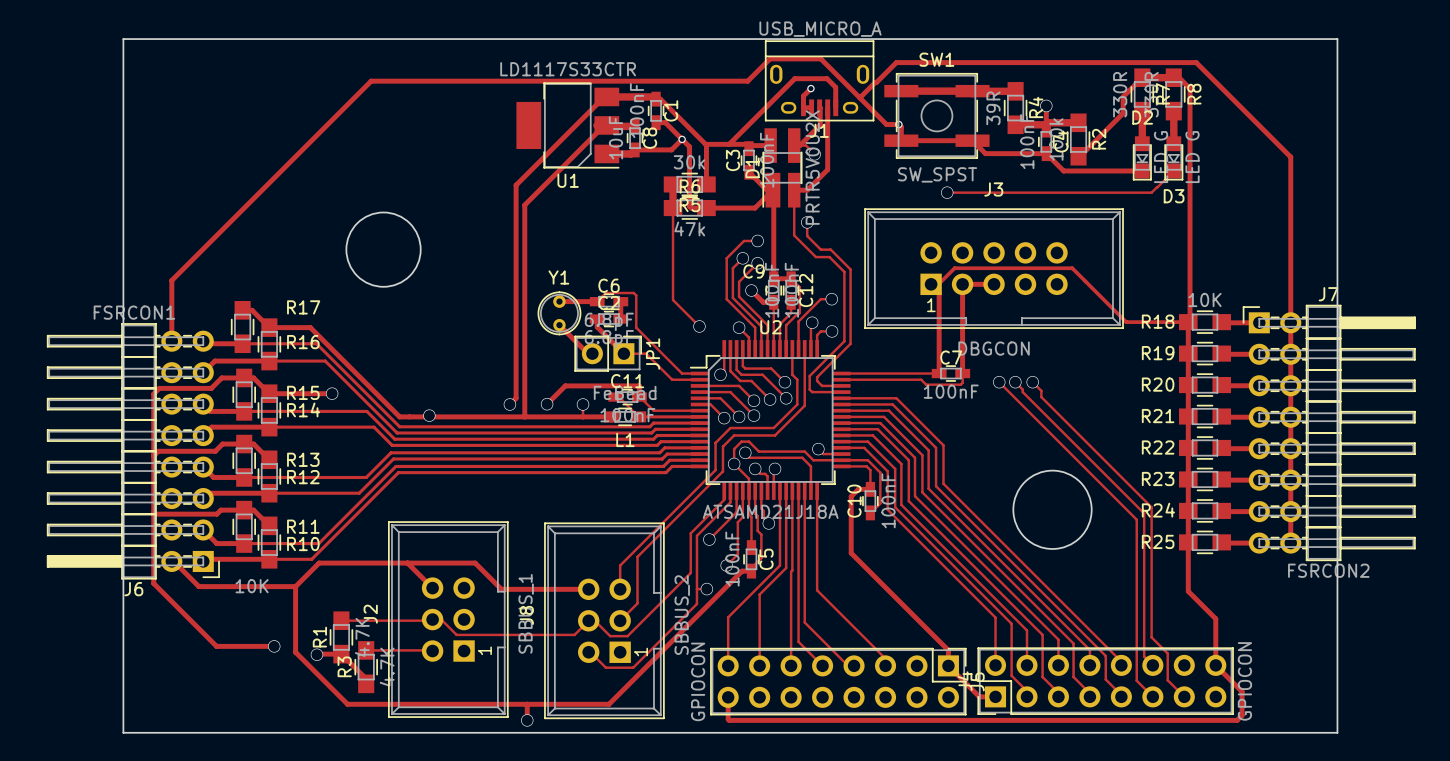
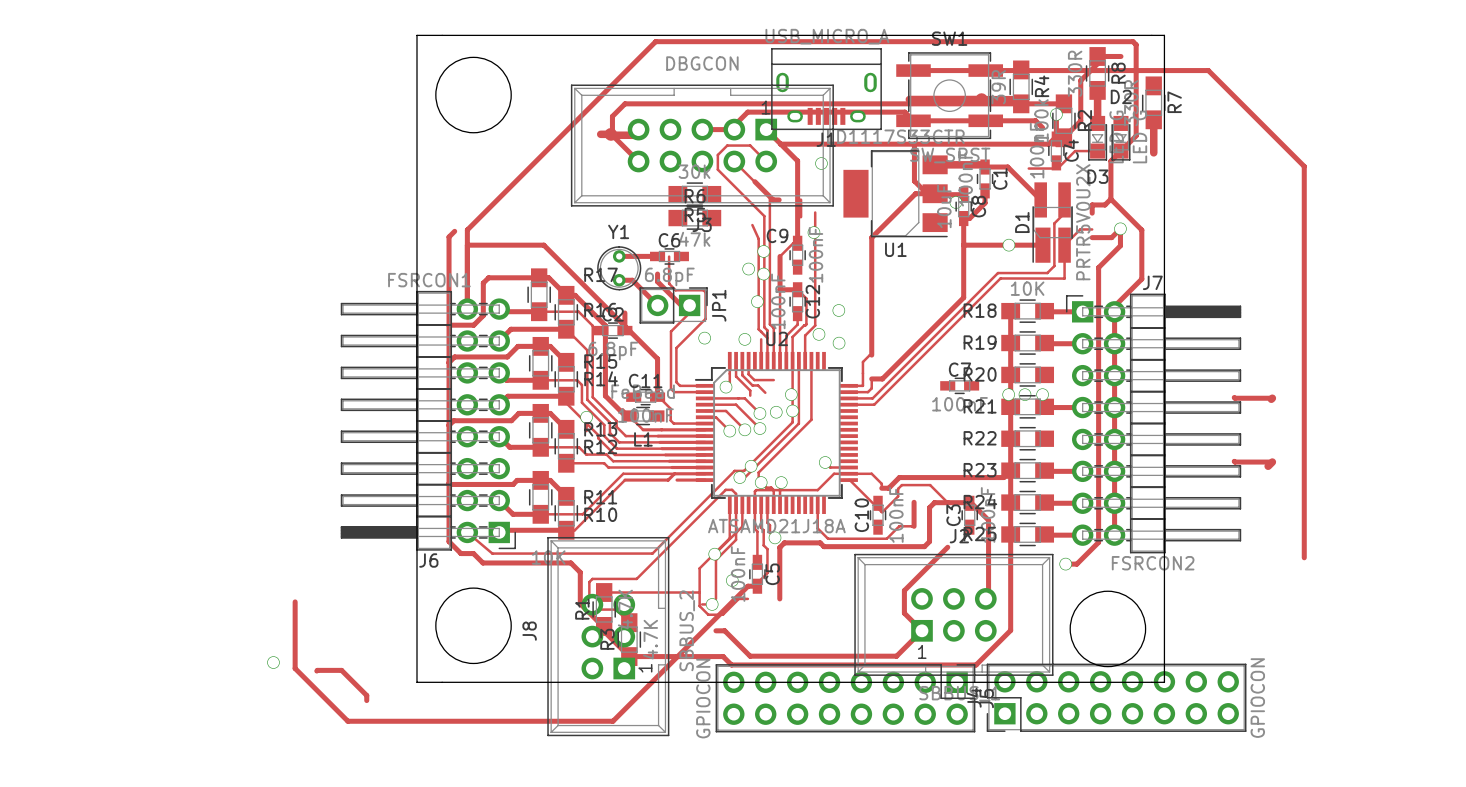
board edge: (123, 39) (1337, 39) (1337, 732) (123, 732) (123, 39) -> (417, 35) (417, 682) (1164, 682) (1164, 35) (417, 35)
track: none -> (1120, 56) (1097, 56) (1097, 63) (1080, 80) (1080, 120) (1063, 137) (1055, 137) (1048, 144) (780, 144)
track: (905, 62) (896, 62) (859, 97) -> none
track: (810, 88) (803, 96) (803, 107) (811, 107) -> none
via: (810, 88) -> none
R8 position: (1173, 94) -> (1097, 73)
track: none -> (1063, 103) (625, 103) (612, 116) (612, 135) (638, 161)
track: (653, 96) (604, 96) (516, 185) (516, 398) (509, 404) -> none
track: (656, 99) (660, 99) (706, 145) (706, 184) -> none
track: (819, 107) (820, 125) (799, 145) (794, 145) (805, 145) (814, 154) -> none
track: (827, 107) (827, 169) (807, 190) (794, 190) (794, 235) (815, 257) (829, 257) (844, 271) (844, 341) (809, 376) (809, 389) (812, 392) (841, 392) -> (1092, 229) (1080, 229) (1064, 245) (1064, 278) (1000, 278) (874, 404) (848, 404)
track: (835, 107) (835, 87) (827, 78) (794, 78) (729, 144) -> none
R4 position: (1015, 108) -> (1021, 86)
C1 position: (656, 110) -> (985, 178)
track: (1173, 111) (1173, 143) -> (1097, 90) (1097, 123)
SW1 position: (936, 115) -> (949, 95)
track: none -> (1042, 127) (1035, 120) (913, 120) (904, 112) (747, 112) (734, 125) (734, 129) (702, 129)
track: (656, 122) (665, 122) (689, 146) (689, 206) (691, 208) (755, 208) (772, 190) -> none
track: (1017, 122) (1015, 124) (1078, 122) (1076, 124) -> none
via: (898, 124) -> none
U1 position: (567, 125) -> (895, 193)
track: (606, 125) (604, 125) (524, 205) (524, 416) -> none
track: none -> (914, 144) (914, 181) (927, 193)
C8 position: (635, 138) -> (963, 206)
track: (682, 139) (671, 149) (635, 149) (631, 153) (606, 153) -> none
via: (682, 139) -> none
R2 position: (1078, 139) -> (1063, 120)
track: (705, 144) (770, 145) -> none
track: none -> (1097, 154) (1097, 151) (1075, 151) (1057, 168) (1028, 168)
track: none -> (766, 161) (750, 145) (727, 145) (717, 154) (717, 169) (764, 216) (764, 327) (767, 330) (767, 338)
track: none -> (932, 164) (982, 164)
track: (1078, 156) (1123, 113) (1123, 96) (1142, 77) (1179, 77) (1190, 88) (1190, 320) (1188, 322) -> none
track: none -> (985, 167) (1007, 167) (1040, 199) (1038, 199)
D2 position: (1142, 158) -> (1120, 138)
D3 position: (1173, 158) -> (1097, 138)
C3 position: (749, 160) -> (969, 515)
D1 position: (782, 167) -> (1052, 222)
track: (1142, 170) (1063, 170) (1046, 153) (985, 153) (972, 140) (901, 140) (901, 126) (898, 124) (886, 124) (820, 58) (770, 58) (747, 81) (371, 81) (171, 280) (171, 341) -> none
track: (1173, 174) (1173, 170) (1151, 192) (947, 192) -> none
track: (673, 184) (673, 300) (699, 326) -> none
track: none -> (1110, 199) (1141, 230) (1141, 279) (1114, 306) (1114, 535)
track: none -> (1110, 199) (1105, 204) (1092, 204) (1092, 213)
track: none -> (1110, 199) (1110, 161) (1136, 135) (1136, 44) (1133, 41) (655, 41) (467, 229) (467, 309)
track: (772, 190) (773, 245) -> (766, 129) (797, 161) (797, 243) (793, 243) (780, 256)
via: none -> (1120, 228)
track: none -> (454, 231) (449, 237) (449, 541) (460, 553) (473, 553) (482, 562) (570, 562) (580, 572) (580, 603) (602, 626)
track: (807, 222) (807, 236) (820, 249) (830, 249) (850, 269) (850, 343) (817, 377) (817, 380) (822, 385) (841, 385) -> (1064, 199) (1064, 213) (1054, 223) (1054, 266) (1047, 273) (997, 273) (872, 398) (848, 398)
track: none -> (1092, 237) (1111, 237) (1120, 228) (1120, 245) (1098, 267) (1098, 542) (1076, 564) (1065, 564)
track: none -> (963, 245) (1042, 245)
via: none -> (1008, 245)
track: (757, 240) (744, 240) (726, 258) (726, 299) (755, 327) -> none
round board edge position: (383, 249) -> (473, 95)
track: (742, 258) (732, 268) (732, 297) (752, 317) -> (752, 225) (758, 238) (758, 329)
track: (757, 263) (739, 281) (739, 296) (767, 325) -> (734, 161) (769, 197) (769, 324) (773, 328) (773, 336)
J3 rotation: 0° (994, 268) -> 180° (702, 145)
J3 position: (994, 268) -> (702, 145)
track: none -> (619, 280) (632, 280) (657, 305)
track: (994, 284) (962, 284) (962, 373) -> none
track: (751, 290) (763, 302) (773, 302) -> (780, 289) (780, 313)
C9 position: (773, 290) -> (797, 255)
track: (831, 299) (820, 299) (798, 321) (798, 323) -> (815, 212) (815, 325) (805, 335)
track: none -> (1010, 311) (1010, 630) (976, 664) (731, 664) (723, 656) (629, 656) (604, 631) (604, 625)
track: (559, 301) (597, 301) -> (619, 256) (657, 256)
track: (597, 301) (605, 293) (633, 293) (636, 295) (636, 327) (682, 373) -> (669, 256) (669, 283) (675, 290) (703, 290) (705, 292) (705, 318) (676, 348) (676, 382) (680, 385) (687, 385)
C6 position: (609, 301) -> (669, 256)
track: (242, 310) (252, 310) (269, 327) (310, 327) (399, 416) (611, 416) (611, 419) -> none
track: none -> (449, 325) (473, 325) (483, 315) (483, 283) (488, 277) (548, 277) (566, 295) (575, 295) (605, 325) (605, 395) (625, 416) (629, 416)
Y1 position: (559, 313) -> (619, 268)
track: none -> (566, 329) (511, 329) (499, 341)
track: (597, 319) (597, 327) (623, 353) (646, 353) (672, 379) -> (657, 274) (657, 281) (681, 305) (689, 305) (689, 313) (671, 331) (671, 388) (677, 392)
track: (812, 322) (810, 349) -> none
track: (1188, 322) (1126, 322) (1072, 268) (954, 268) (938, 284) (931, 284) (939, 292) (939, 373) (855, 373) -> (963, 194) (915, 193) (871, 237) (871, 355) (862, 361) (862, 385)
track: (1188, 322) (1188, 591) (1215, 618) (1215, 665) (1242, 691) (1242, 715) (1237, 720) (729, 720) (728, 697) -> none
R18 position: (1205, 322) -> (1027, 311)
track: (1221, 322) (1259, 322) -> (1044, 311) (1082, 311)
track: (559, 325) (588, 353) (592, 353) -> none
R17 position: (242, 327) -> (539, 294)
track: (739, 327) (749, 337) (749, 349) -> none
track: (832, 331) (820, 331) (817, 335) (817, 349) -> none
track: (203, 341) (205, 343) (316, 343) (399, 426) (649, 426) (653, 423) -> (499, 309) (501, 311) (578, 311) (592, 325) (592, 397) (616, 421) (616, 426) (625, 436) (658, 436)
R16 position: (269, 344) -> (566, 312)
track: none -> (792, 361) (792, 422) (744, 470) (734, 470) (652, 553) (492, 553) (467, 532) (469, 532)
track: none -> (566, 362) (550, 346) (518, 346) (507, 356) (454, 356) (449, 362)
JP1 position: (608, 353) -> (673, 305)
R19 position: (1205, 353) -> (1027, 343)
track: (1221, 353) (1259, 354) -> (1044, 343) (1082, 343)
track: (742, 362) (745, 368) (771, 368) (784, 382) -> (748, 374) (754, 380) (773, 380)
track: (736, 363) (736, 369) (741, 374) (762, 374) (786, 398) -> (742, 375) (752, 385) (758, 385) (765, 392)
track: (730, 364) (730, 371) (740, 380) (751, 380) (770, 399) -> (736, 376) (750, 390) (750, 395)
track: (203, 372) (214, 361) (325, 361) (397, 432) (651, 432) (655, 429) -> (566, 329) (587, 350) (587, 399) (609, 422) (609, 433) (619, 442) (660, 442)
track: (962, 373) (962, 382) (960, 384) (926, 384) (921, 379) (860, 379) -> (985, 190) (985, 203) (969, 218) (963, 218) (963, 297) (882, 378) (871, 378) (871, 388) (867, 392)
track: (792, 374) (797, 379) (797, 404) (773, 428) (730, 428) (715, 442) (715, 470) (620, 565) (620, 589) -> (798, 387) (798, 423) (741, 481)
track: (999, 382) (1136, 519) (1136, 680) (1152, 696) -> none
track: (1015, 382) (1022, 392) (1144, 513) (1144, 656) (1152, 665) -> none
track: (1032, 382) (1041, 390) (1041, 397) (1151, 507) (1151, 637) (1167, 653) (1167, 680) (1184, 696) -> none
R20 position: (1205, 385) -> (1027, 374)
track: none -> (566, 403) (566, 396) (507, 396) (499, 404)
track: (332, 393) (269, 393) (253, 377) (221, 377) (211, 388) (159, 388) (153, 393) (153, 583) (216, 646) (274, 646) -> none
via: (332, 393) -> none
R15 position: (244, 394) -> (540, 363)
C11 position: (627, 397) -> (645, 397)
track: (841, 398) (896, 398) (943, 445) (943, 483) (1121, 661) (1121, 665) -> none
track: (203, 404) (210, 411) (366, 411) (394, 439) (653, 439) (657, 435) -> (499, 372) (506, 380) (577, 380) (581, 384) (581, 402) (604, 425) (604, 436) (616, 448) (661, 448)
via: (509, 404) -> none
track: (547, 404) (565, 385) (639, 385) (639, 397) (653, 410) (668, 410) -> (467, 245) (543, 245) (657, 358) (657, 397) (670, 408) (670, 420) (673, 423)
via: (547, 404) -> none
track: (841, 404) (892, 404) (936, 447) (936, 486) (1105, 655) (1105, 679) (1121, 696) -> none
track: (804, 405) (775, 435) (734, 435) (722, 446) (722, 471) (637, 556) (637, 603) (620, 620) -> (811, 418) (758, 472) (758, 478)
R14 position: (269, 410) -> (566, 379)
track: (841, 410) (888, 410) (928, 450) (928, 488) (1089, 650) (1089, 665) -> none
via: (429, 415) -> none
L1 position: (625, 416) -> (643, 416)
track: (841, 416) (884, 416) (922, 455) (922, 492) (1073, 643) (1073, 677) (1089, 693) (1089, 696) -> none
R21 position: (1205, 416) -> (1027, 406)
track: (1221, 416) (1259, 417) -> (1044, 406) (1082, 407)
track: (841, 423) (880, 423) (915, 457) (915, 496) (1058, 639) (1058, 665) -> none
track: (841, 429) (877, 429) (908, 460) (908, 501) (1042, 634) (1042, 677) (1058, 692) (1058, 696) -> none
J7 position: (1329, 432) -> (1153, 423)
track: (203, 435) (211, 427) (373, 427) (392, 445) (657, 445) (661, 441) -> (566, 403) (614, 454) (665, 454)
track: (841, 435) (872, 435) (901, 463) (901, 504) (1026, 630) (1026, 665) -> none
track: (841, 441) (867, 441) (895, 468) (895, 507) (1011, 623) (1011, 675) (1026, 691) (1026, 696) -> none
track: (664, 447) (659, 452) (390, 452) (366, 477) (213, 477) (203, 467) -> (669, 461) (613, 461) (606, 454) (586, 454) (579, 447) (509, 447) (499, 436)
track: (841, 447) (864, 447) (887, 471) (887, 509) (995, 617) (995, 665) -> none
R22 position: (1205, 447) -> (1027, 438)
J6 position: (133, 451) -> (428, 420)
track: (745, 452) (749, 457) (802, 457) (810, 466) (810, 490) -> (914, 502) (914, 526) (899, 526) (886, 538) (828, 538) (817, 528) (817, 504)
track: (667, 454) (662, 459) (393, 459) (359, 493) (208, 493) (203, 498) -> (672, 467) (608, 467) (604, 463) (566, 463)
track: (153, 455) (158, 451) (215, 451) (222, 444) (253, 444) (269, 459) -> (449, 425) (453, 420) (511, 420) (518, 413) (550, 413) (566, 429)
R13 position: (244, 460) -> (540, 430)
track: none -> (674, 473) (623, 473) (582, 514) (513, 514) (499, 500)
track: (827, 460) (813, 460) (804, 451) (758, 451) (749, 441) (741, 441) (734, 449) (734, 463) (749, 478) -> (834, 473) (817, 490) (756, 490) (754, 492)
track: (864, 460) (867, 460) (880, 472) (880, 503) (870, 512) -> (871, 473) (881, 483) (881, 488) (888, 488) (899, 477) (1003, 477) (1010, 470)
track: (620, 466) (395, 466) (318, 543) (216, 543) (203, 529) -> (625, 480) (574, 530) (501, 530) (499, 532)
track: (672, 466) (666, 472) (398, 472) (311, 559) (205, 559) (203, 561) -> none
track: (842, 466) (866, 466) (870, 470) (870, 489) (858, 489) (851, 496) (851, 553) (948, 650) (948, 665) (979, 696) (995, 696) -> (849, 480) (881, 512) (898, 496) (898, 488) (901, 485) (930, 485) (947, 502)
round board edge: [1012, 470, 1093, 550] -> none
R12 position: (269, 476) -> (566, 446)
R23 position: (1205, 479) -> (1027, 470)
track: (1221, 479) (1259, 480) -> (1044, 470) (1082, 471)
track: none -> (736, 504) (736, 493) (732, 489) (725, 489) (636, 578) (592, 578) (589, 582) (589, 603) (595, 609) (616, 609) (629, 622)
track: (742, 490) (742, 517) (737, 522) (737, 554) (726, 565) -> none
track: (779, 490) (779, 565) (728, 617) (728, 665) -> none
track: (786, 490) (786, 568) (759, 594) (759, 665) -> none
track: (792, 490) (791, 665) -> none
track: (798, 490) (798, 641) (822, 665) -> none
track: (804, 490) (804, 622) (848, 665) (854, 665) -> none
track: (817, 490) (817, 590) (885, 658) (885, 665) -> none
track: (724, 499) (690, 533) (690, 572) (627, 636) (610, 636) (594, 620) (588, 620) (574, 634) (456, 634) (441, 619) (341, 620) -> (729, 513) (729, 538) (699, 568) (699, 606) (708, 614) (723, 614) (738, 598) (747, 598)
track: (730, 502) (696, 535) (696, 603) (633, 667) (605, 667) (588, 652) -> (736, 516) (736, 539) (715, 559) (715, 598)
R24 position: (1205, 510) -> (1027, 502)
track: (1221, 510) (1259, 511) -> (1044, 502) (1082, 503)
track: (153, 514) (216, 514) (220, 510) (253, 510) (269, 525) -> (449, 484) (513, 484) (517, 480) (550, 480) (566, 496)
R11 position: (244, 526) -> (540, 497)
track: none -> (947, 547) (904, 590) (904, 613) (921, 630) (896, 656) (750, 656) (724, 630) (715, 630)
R10 position: (269, 542) -> (566, 513)
R25 position: (1205, 542) -> (1027, 534)
track: (1221, 542) (1259, 543) -> (1044, 534) (1082, 535)
via: none -> (1065, 564)
track: (171, 561) (198, 586) (295, 586) (319, 563) (475, 563) (501, 589) (588, 589) -> none
track: (407, 563) (432, 588) -> none
round board edge: none -> [435, 587, 512, 665]
round board edge: none -> [1069, 590, 1147, 668]
track: none -> (604, 592) (699, 592)
track: none -> (779, 598) (779, 547) (784, 542) (820, 542) (824, 546) (924, 546) (929, 541) (929, 507) (934, 502) (971, 503) (988, 520) (988, 596) (985, 598)
J2 rotation: 0° (448, 619) -> 90° clockwise (953, 614)
J2 position: (448, 619) -> (953, 614)
R1 position: (341, 637) -> (604, 609)
track: (366, 650) (432, 651) -> none
via: (316, 654) -> none
R3 position: (366, 667) -> (629, 639)
track: (527, 704) (527, 720) -> none
via: (527, 720) -> none

